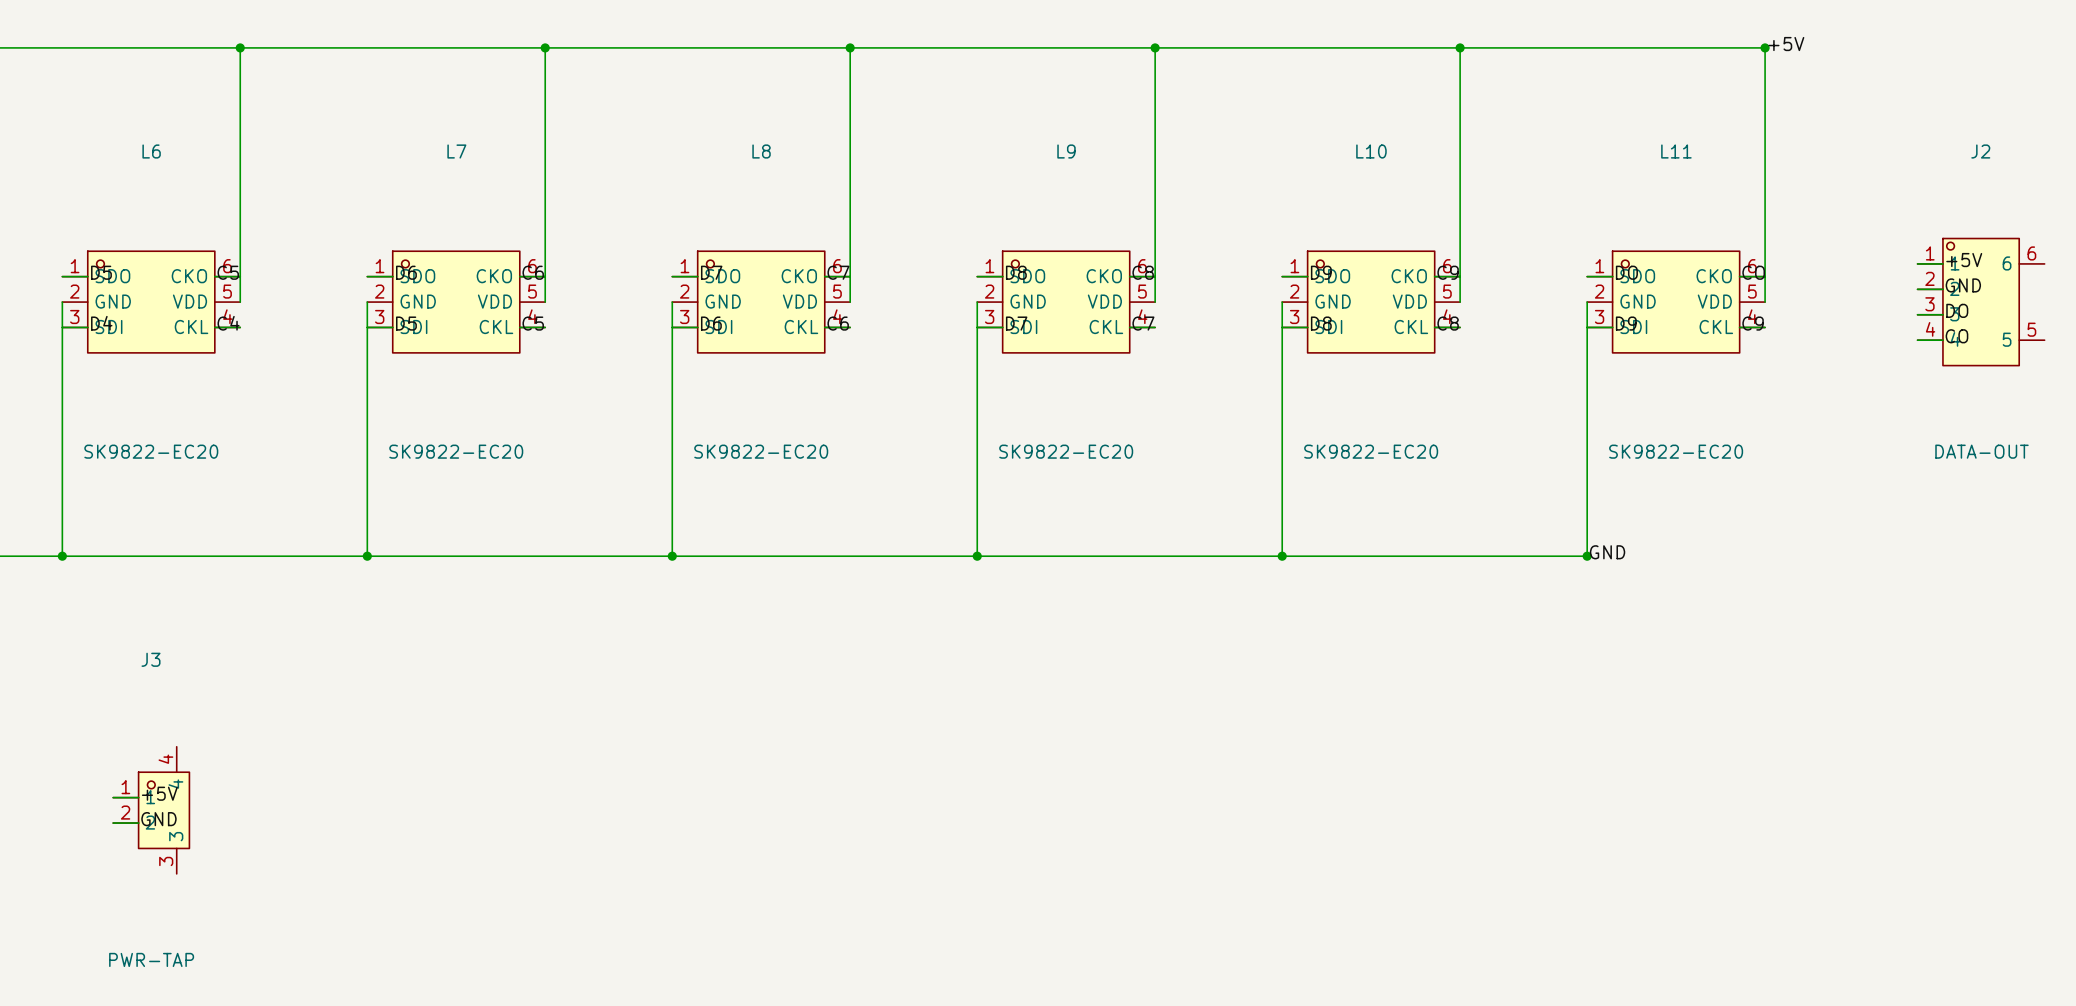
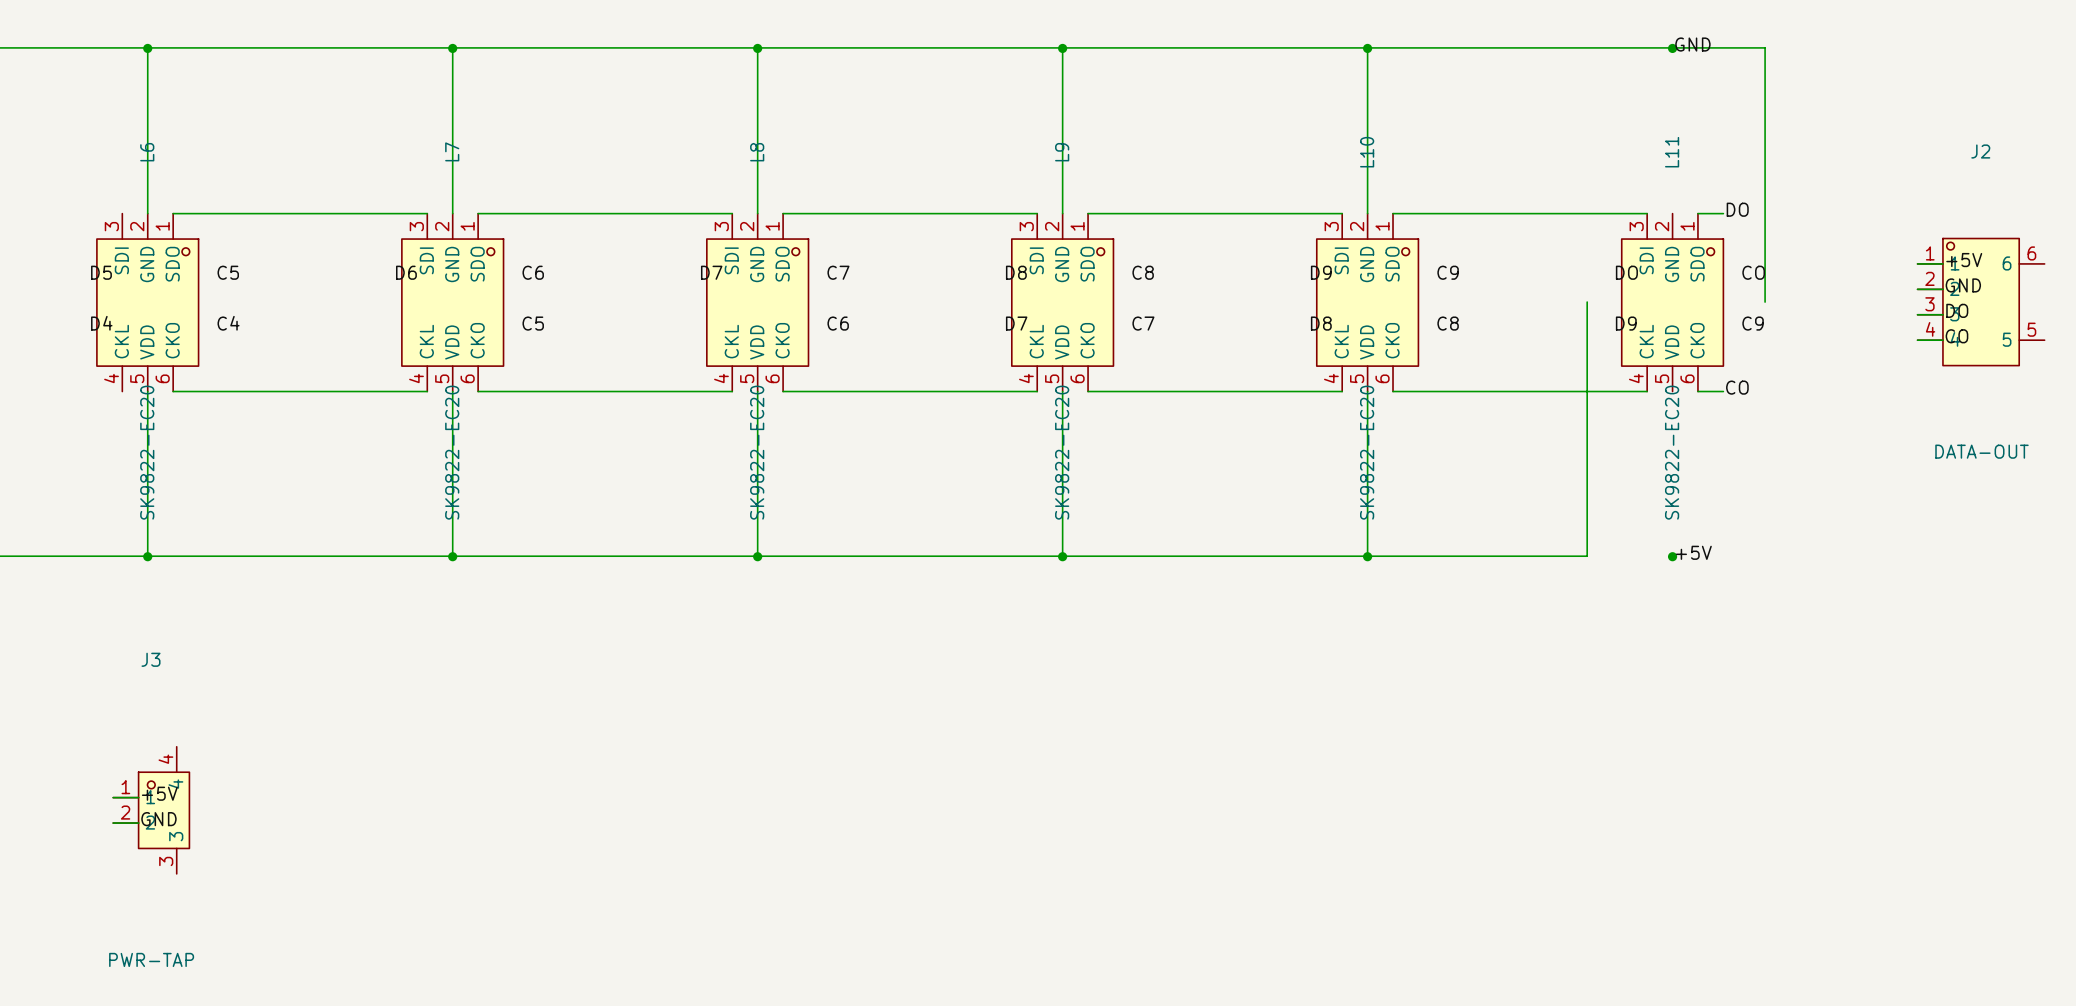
label: none -> GND (1692, 44)
label: +5V (1786, 44) -> none
wire: (240, 47) (240, 302) -> none
junction: (240, 47) -> none
wire: (545, 47) (545, 302) -> none
junction: (545, 47) -> none
wire: (850, 47) (850, 302) -> none
junction: (850, 47) -> none
wire: (1155, 47) (1155, 302) -> none
junction: (1155, 47) -> none
wire: (1460, 47) (1460, 302) -> none
junction: (1460, 47) -> none
junction: (1765, 47) -> none
wire: none -> (147, 48) (147, 213)
junction: none -> (147, 48)
wire: none -> (452, 48) (452, 213)
junction: none -> (452, 48)
wire: none -> (757, 48) (757, 213)
junction: none -> (757, 48)
wire: none -> (1062, 48) (1062, 213)
junction: none -> (1062, 48)
wire: none -> (1367, 48) (1367, 213)
junction: none -> (1367, 48)
junction: none -> (1672, 48)
label: none -> DO (1737, 209)
wire: none -> (173, 213) (427, 213)
wire: none -> (478, 213) (732, 213)
wire: none -> (783, 213) (1037, 213)
wire: none -> (1088, 213) (1342, 213)
wire: none -> (1393, 213) (1647, 213)
wire: (62, 276) (87, 276) -> none
wire: (214, 276) (240, 276) -> none
wire: (367, 276) (392, 276) -> none
wire: (519, 276) (545, 276) -> none
wire: (672, 276) (697, 276) -> none
wire: (824, 276) (850, 276) -> none
wire: (977, 276) (1002, 276) -> none
wire: (1129, 276) (1155, 276) -> none
wire: (1282, 276) (1307, 276) -> none
wire: (1434, 276) (1460, 276) -> none
wire: (1587, 276) (1612, 276) -> none
wire: (1739, 276) (1765, 276) -> (1697, 213) (1723, 213)
wire: (62, 302) (62, 556) -> none
L6 rotation: 0° (151, 302) -> 90° clockwise (147, 302)
wire: (367, 302) (367, 556) -> none
L7 rotation: 0° (456, 302) -> 90° clockwise (452, 302)
wire: (672, 302) (672, 556) -> none
L8 rotation: 0° (761, 302) -> 90° clockwise (757, 302)
wire: (977, 302) (977, 556) -> none
L9 rotation: 0° (1066, 302) -> 90° clockwise (1062, 302)
wire: (1282, 302) (1282, 556) -> none
L10 rotation: 0° (1371, 302) -> 90° clockwise (1367, 302)
L11 rotation: 0° (1676, 302) -> 90° clockwise (1672, 302)
label: D5 (406, 323) -> none
label: D6 (711, 323) -> none
wire: (62, 327) (87, 327) -> none
wire: (214, 327) (240, 327) -> none
wire: (367, 327) (392, 327) -> none
wire: (519, 327) (545, 327) -> none
wire: (672, 327) (697, 327) -> none
wire: (824, 327) (850, 327) -> none
wire: (977, 327) (1002, 327) -> none
wire: (1129, 327) (1155, 327) -> none
wire: (1282, 327) (1307, 327) -> none
wire: (1434, 327) (1460, 327) -> none
wire: (1587, 327) (1612, 327) -> none
wire: (1739, 327) (1765, 327) -> (1697, 391) (1723, 391)
label: none -> CO (1737, 387)
wire: none -> (147, 391) (147, 556)
wire: none -> (173, 391) (427, 391)
wire: none -> (452, 391) (452, 556)
wire: none -> (478, 391) (732, 391)
wire: none -> (757, 391) (757, 556)
wire: none -> (783, 391) (1037, 391)
wire: none -> (1062, 391) (1062, 556)
wire: none -> (1088, 391) (1342, 391)
wire: none -> (1367, 391) (1367, 556)
wire: none -> (1393, 391) (1647, 391)
label: GND (1607, 552) -> none
label: none -> +5V (1693, 552)
junction: (62, 556) -> none
junction: none -> (147, 556)
junction: (367, 556) -> none
junction: none -> (452, 556)
junction: (672, 556) -> none
junction: none -> (757, 556)
junction: (977, 556) -> none
junction: none -> (1062, 556)
junction: (1282, 556) -> none
junction: none -> (1367, 556)
junction: (1587, 556) -> none
junction: none -> (1672, 556)

